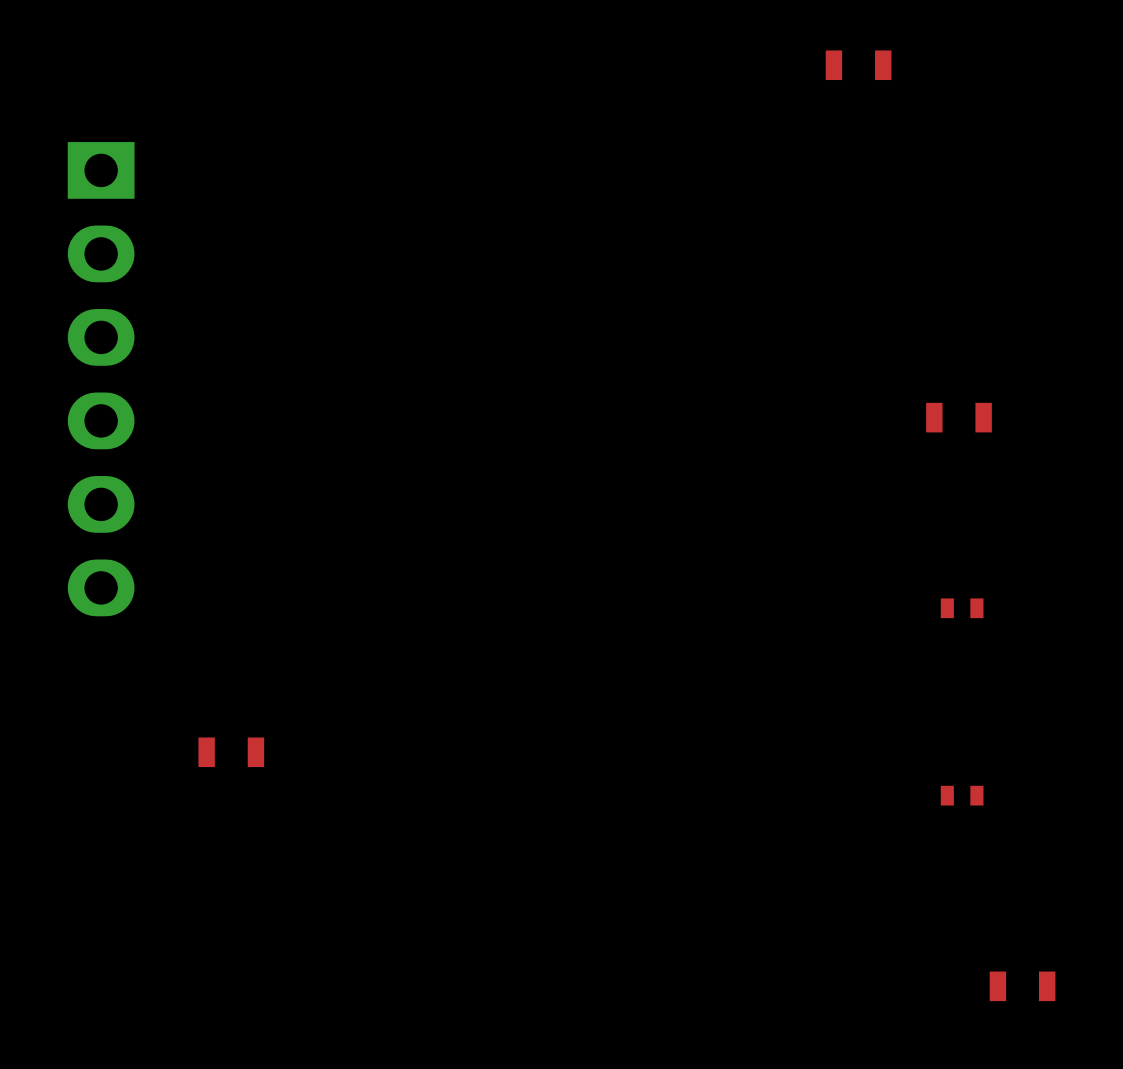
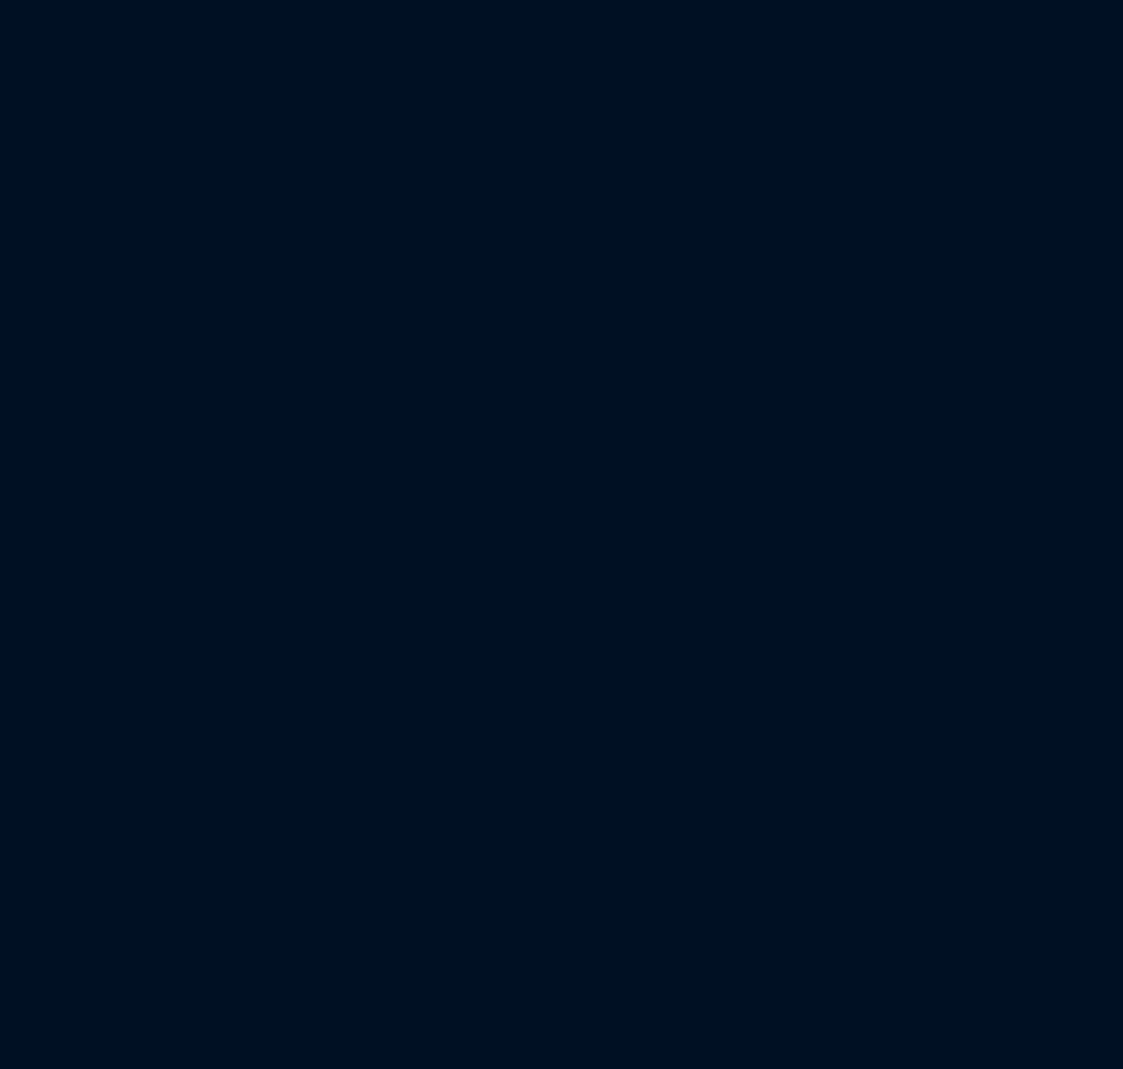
part: (858, 65) -> none
part: (101, 379) -> none
part: (958, 417) -> none
part: (962, 608) -> none
part: (231, 752) -> none
part: (962, 795) -> none
part: (1022, 986) -> none

